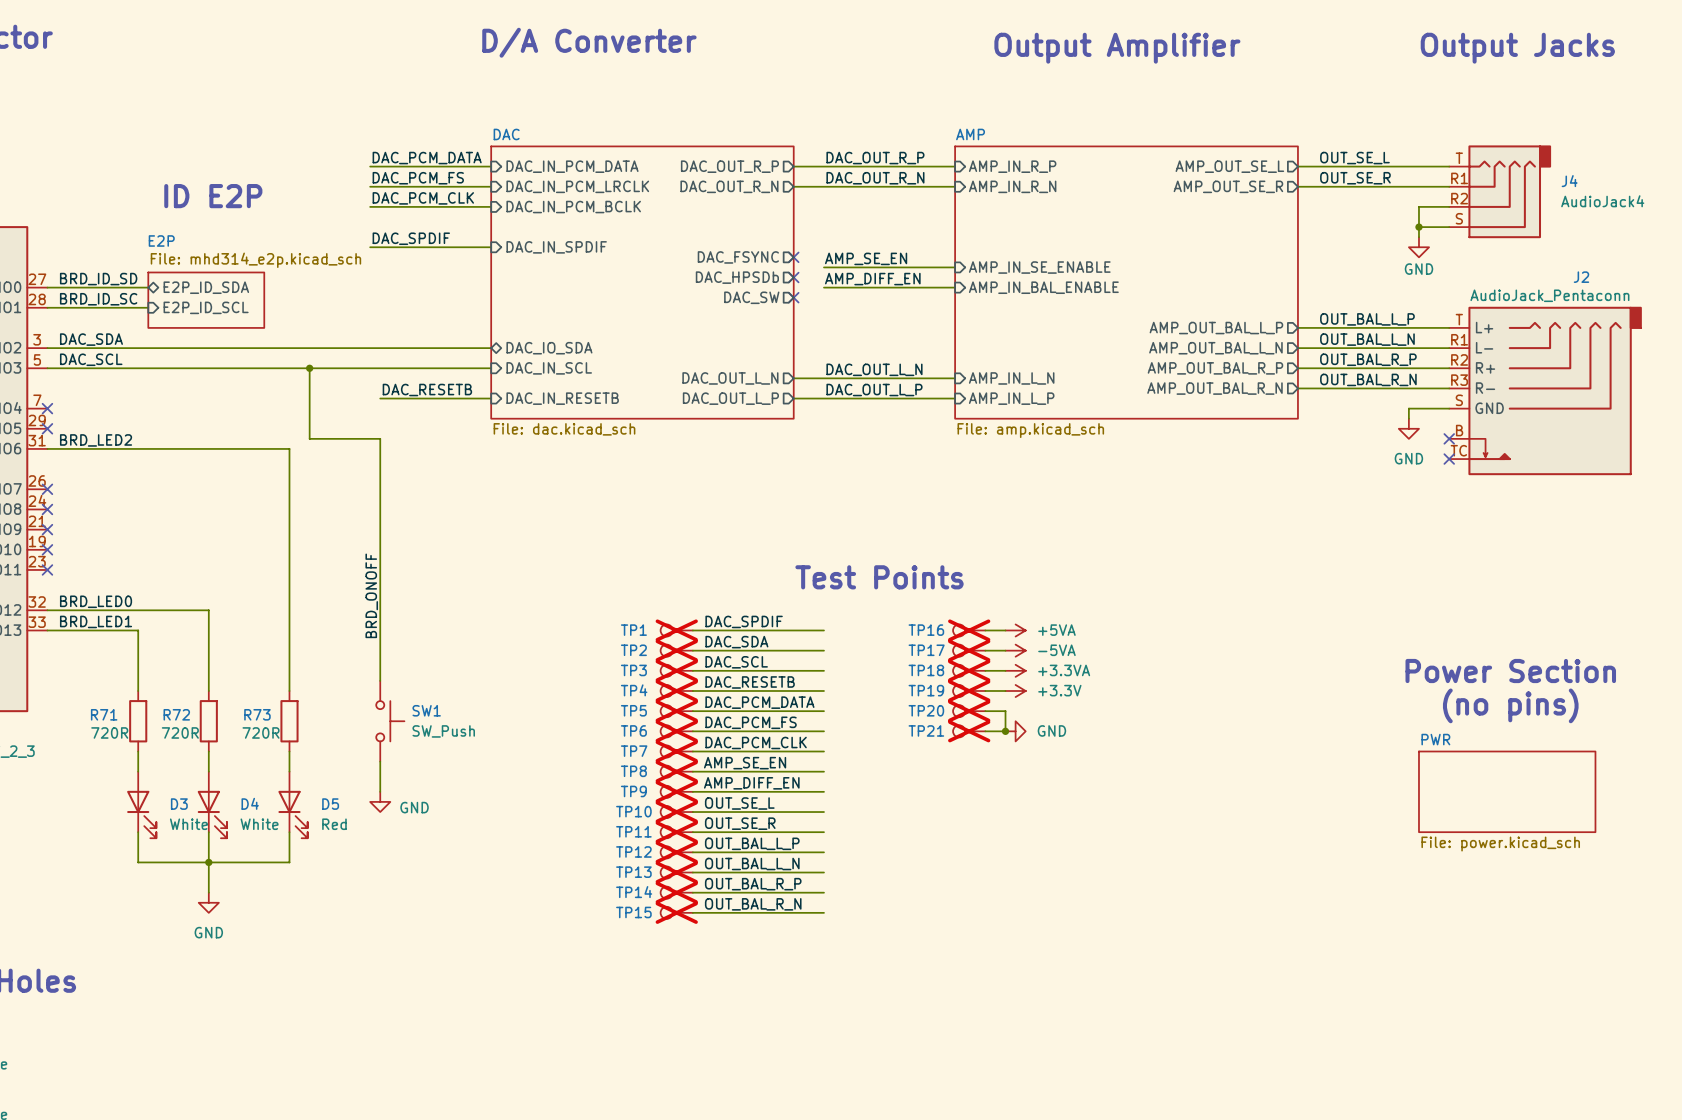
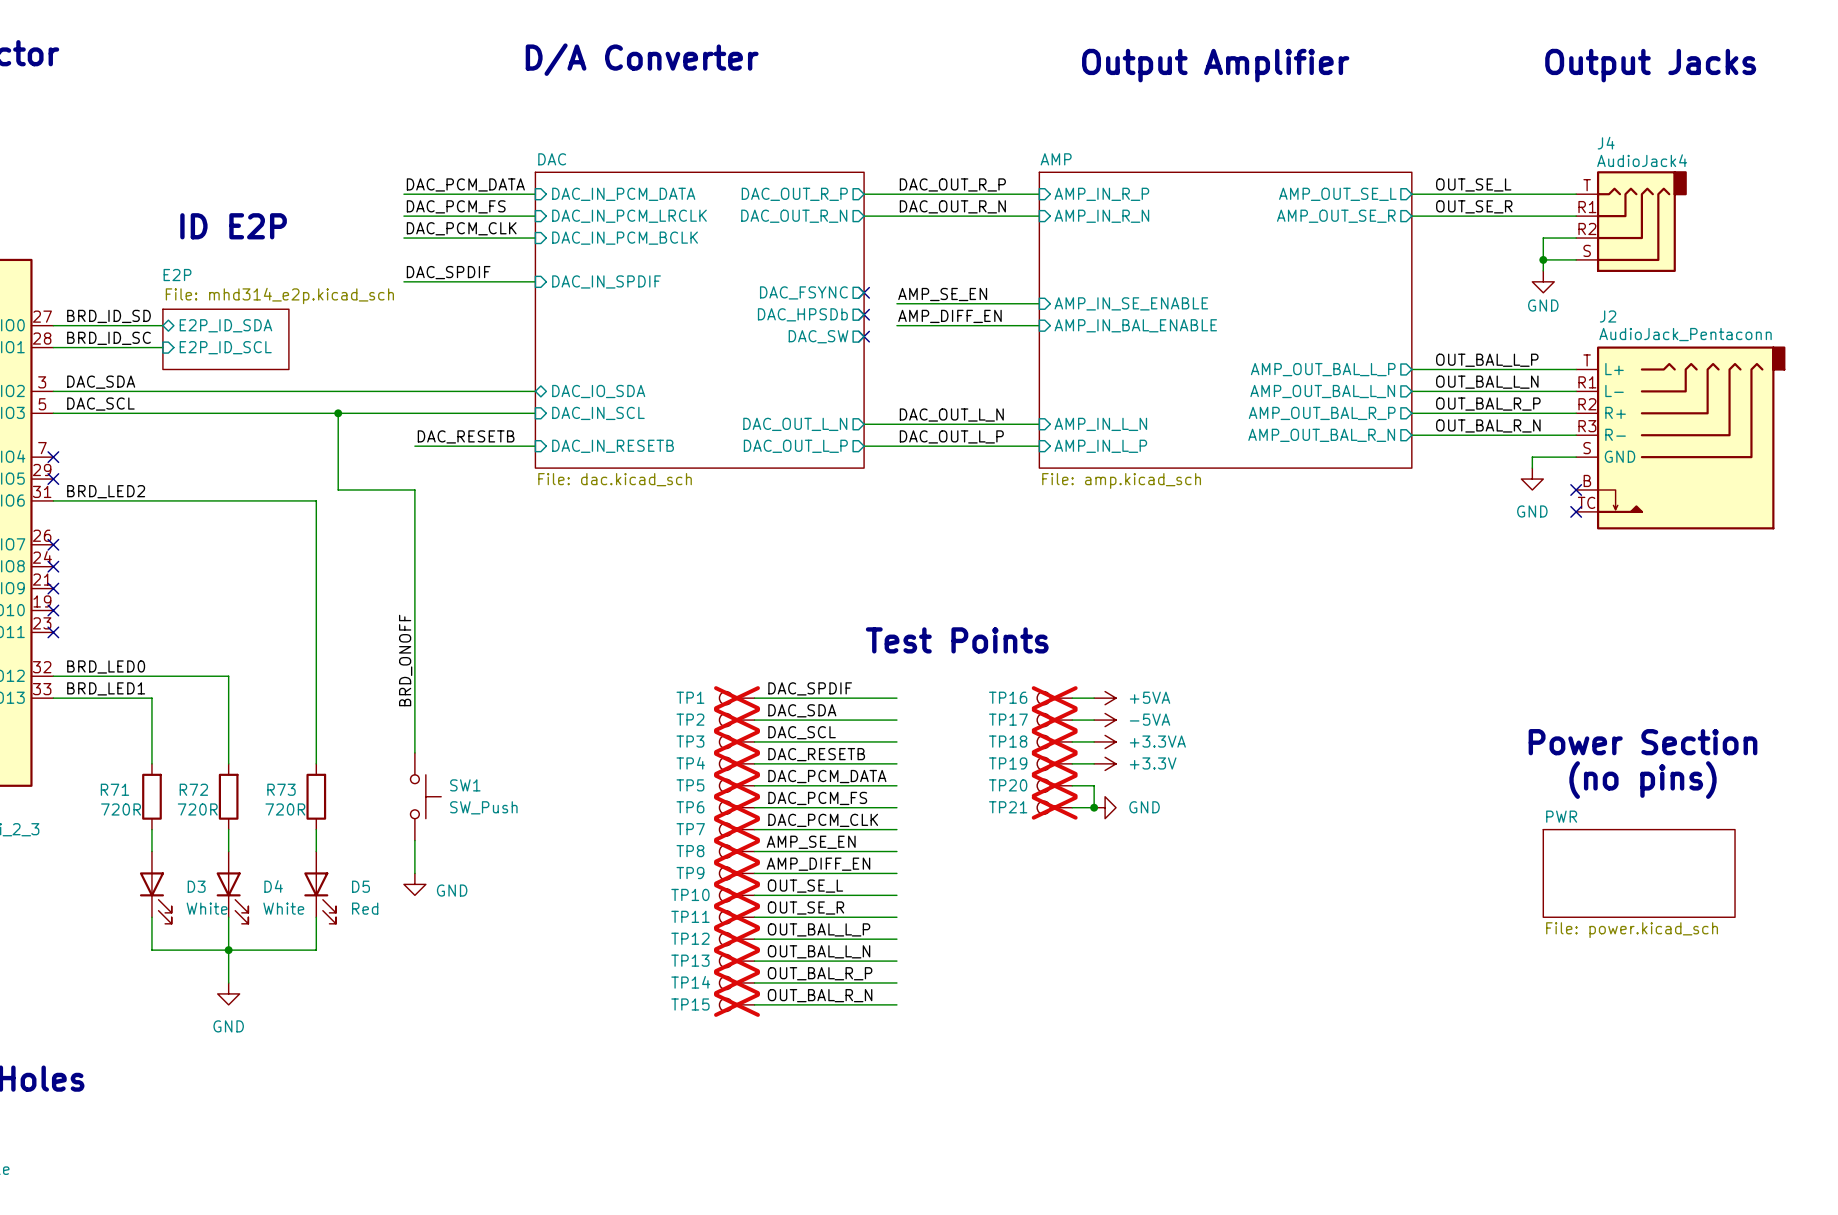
J4 name position: J4 (1569, 181) -> J4 (1606, 143)
J4 value position: AudioJack4 (1602, 201) -> AudioJack4 (1642, 160)
J2 name position: J2 (1581, 277) -> J2 (1608, 316)

